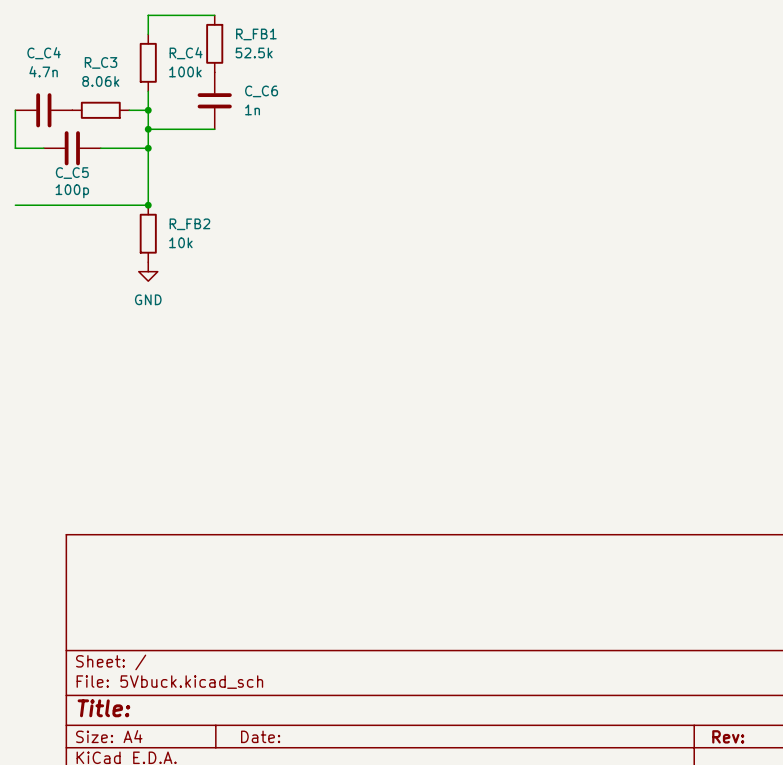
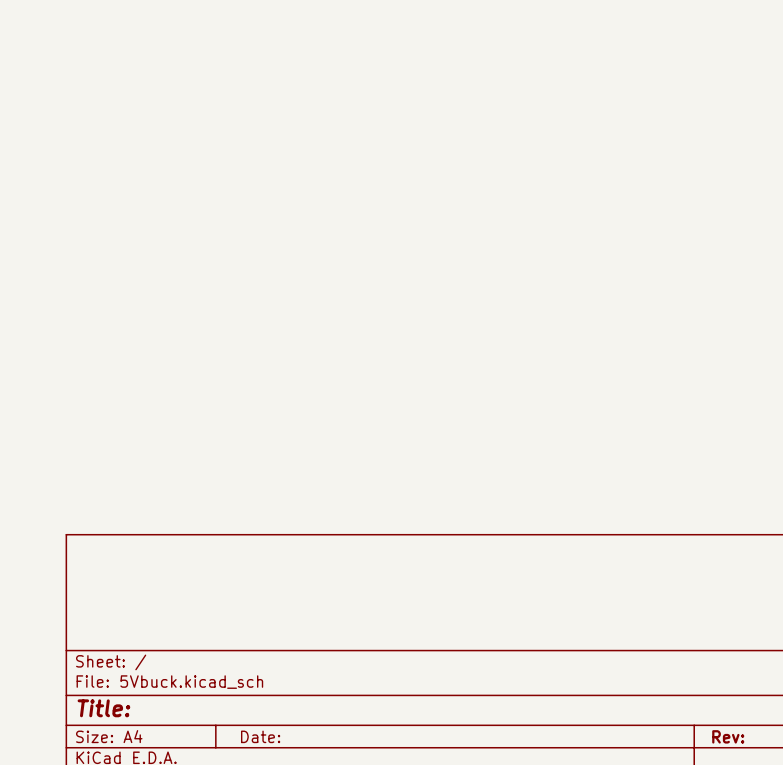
wire: (214, 15) (148, 15) (148, 34) -> none
R_FB1: 52.5k (214, 43) -> none
R_C4: 100k (148, 62) -> none
wire: (148, 91) (148, 205) (15, 205) -> none
C_C6: 1n (214, 100) -> none
wire: (15, 110) (15, 148) (43, 148) -> none
C_C4: 4.7n (43, 110) -> none
R_C3: 8.06k (100, 110) -> none
wire: (129, 110) (148, 110) -> none
junction: (148, 110) -> none
wire: (148, 129) (214, 129) -> none
junction: (148, 129) -> none
C_C5: 100p (72, 148) -> none
wire: (100, 148) (148, 148) -> none
junction: (148, 148) -> none
junction: (148, 205) -> none
R_FB2: 10k (148, 233) -> none
power symbol: GND (148, 271) -> none

